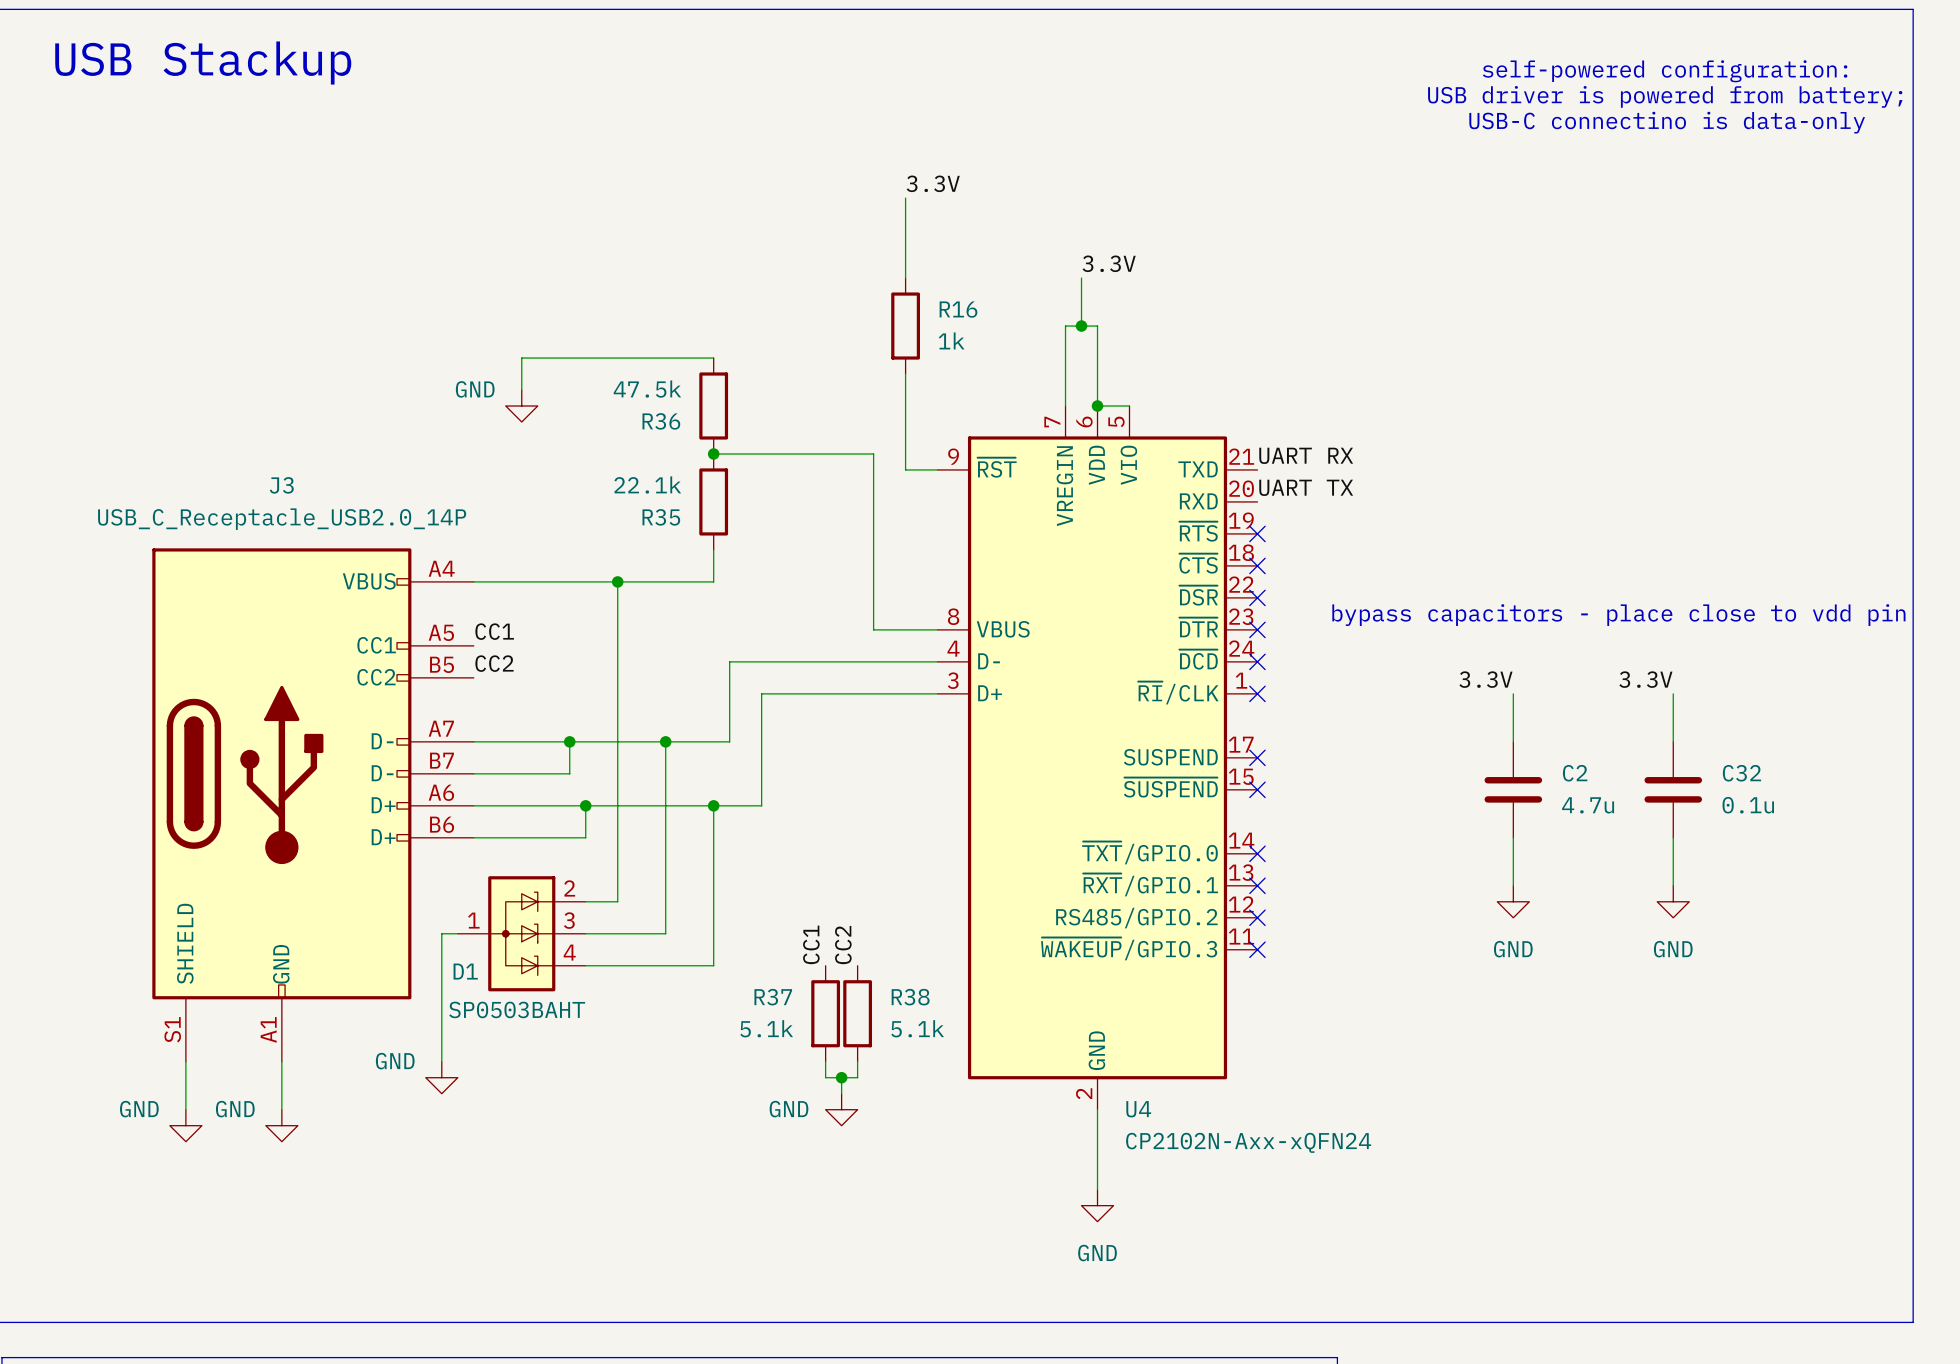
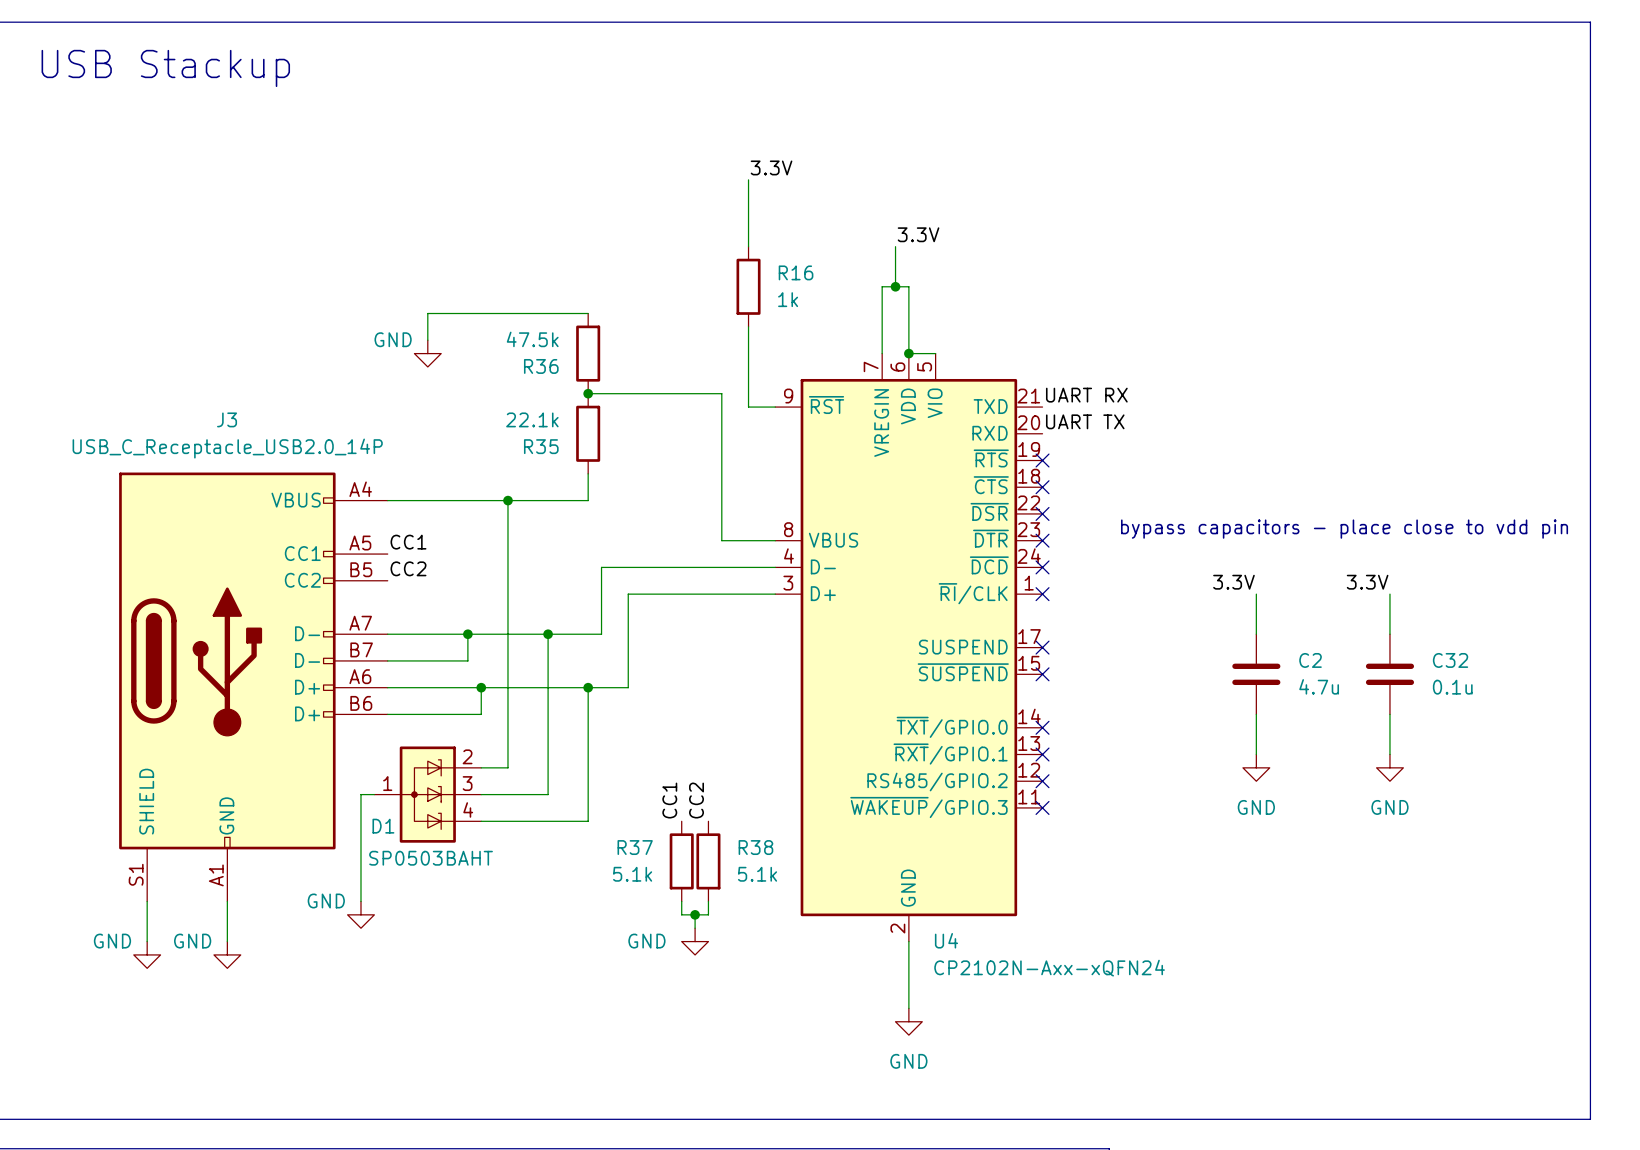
text: self-powered configuration: (1665, 71) -> none
text: USB driver is powered from battery; (1665, 96) -> none
text: USB-C connectino is data-only (1667, 122) -> none

